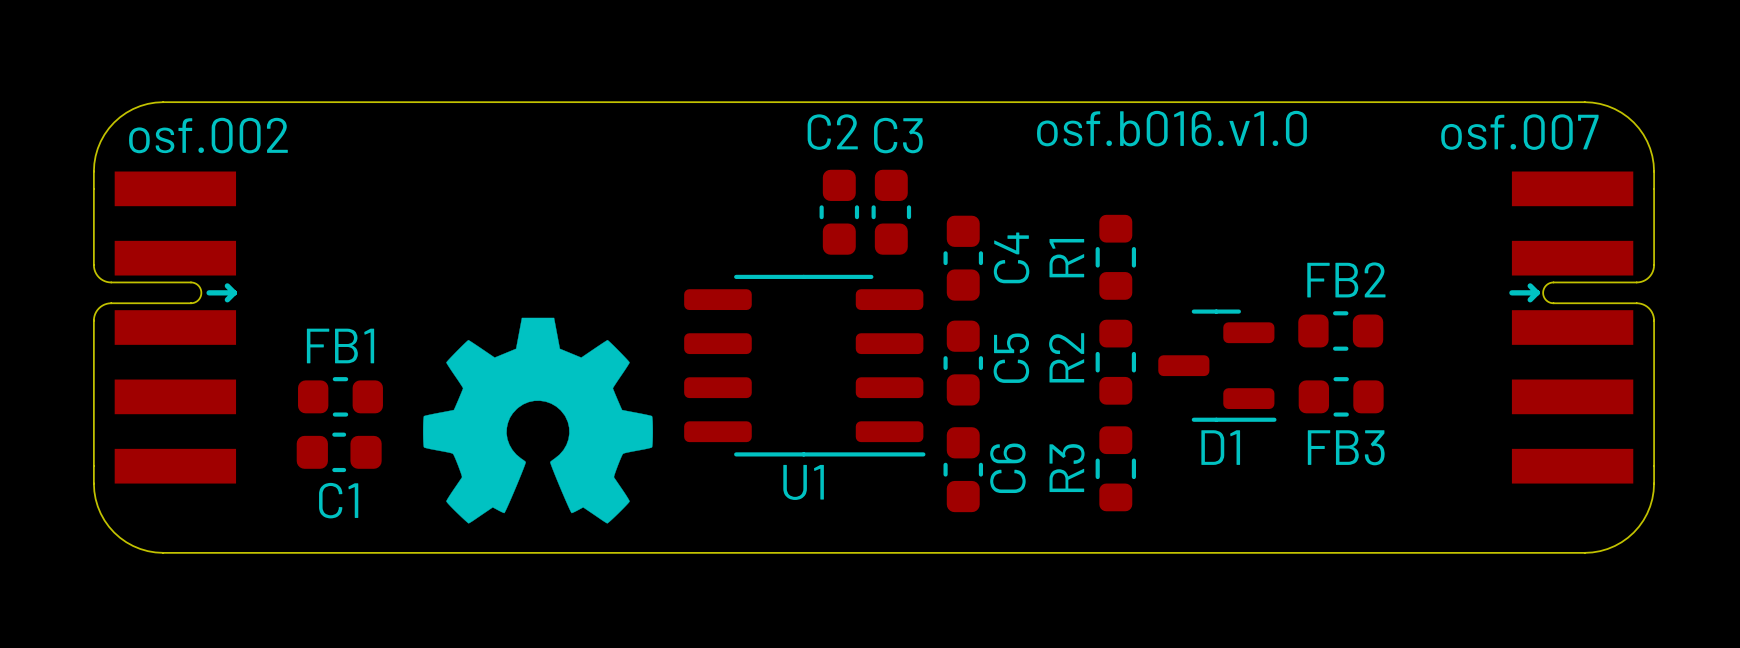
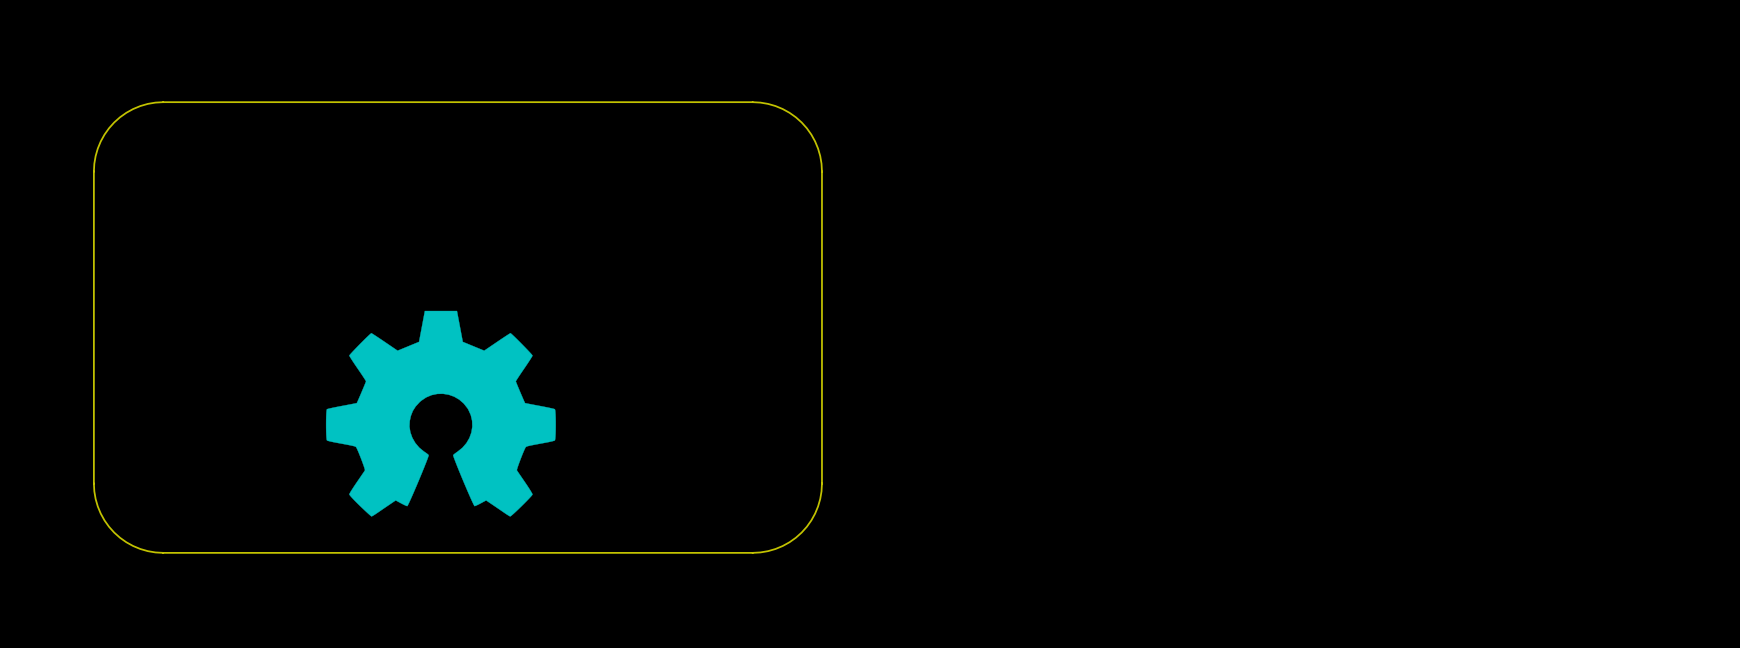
board edge: (752, 102) (1592, 102) (1607, 106) (1621, 112) (1638, 128) (1647, 141) (1652, 156) (1654, 188) -> (752, 102) (775, 106) (789, 112) (801, 122) (815, 141) (820, 156) (821, 171) (821, 483) (820, 498) (811, 520) (795, 537) (775, 548) (752, 552)
text: osf.b016.v1.0 (1171, 128) -> none
text: osf.007 (1519, 132) -> none
text: osf.002 (208, 135) -> none
board edge: none -> (93, 188) (93, 466)
C2: (839, 212) -> none
C3: (891, 212) -> none
R1: (1115, 257) -> none
C4: (963, 258) -> none
part: (164, 327) -> none
part: (1582, 327) -> none
FB2: (1340, 330) -> none
R2: (1115, 362) -> none
C5: (963, 363) -> none
U1: (804, 365) -> none
D1: (1217, 365) -> none
FB1: (340, 396) -> none
FB3: (1341, 396) -> none
drawing position: (537, 420) -> (440, 413)
C1: (339, 452) -> none
board edge: (1654, 466) (1652, 498) (1647, 513) (1638, 526) (1621, 542) (1607, 548) (1592, 552) (752, 552) -> none
R3: (1115, 468) -> none
C6: (963, 469) -> none

